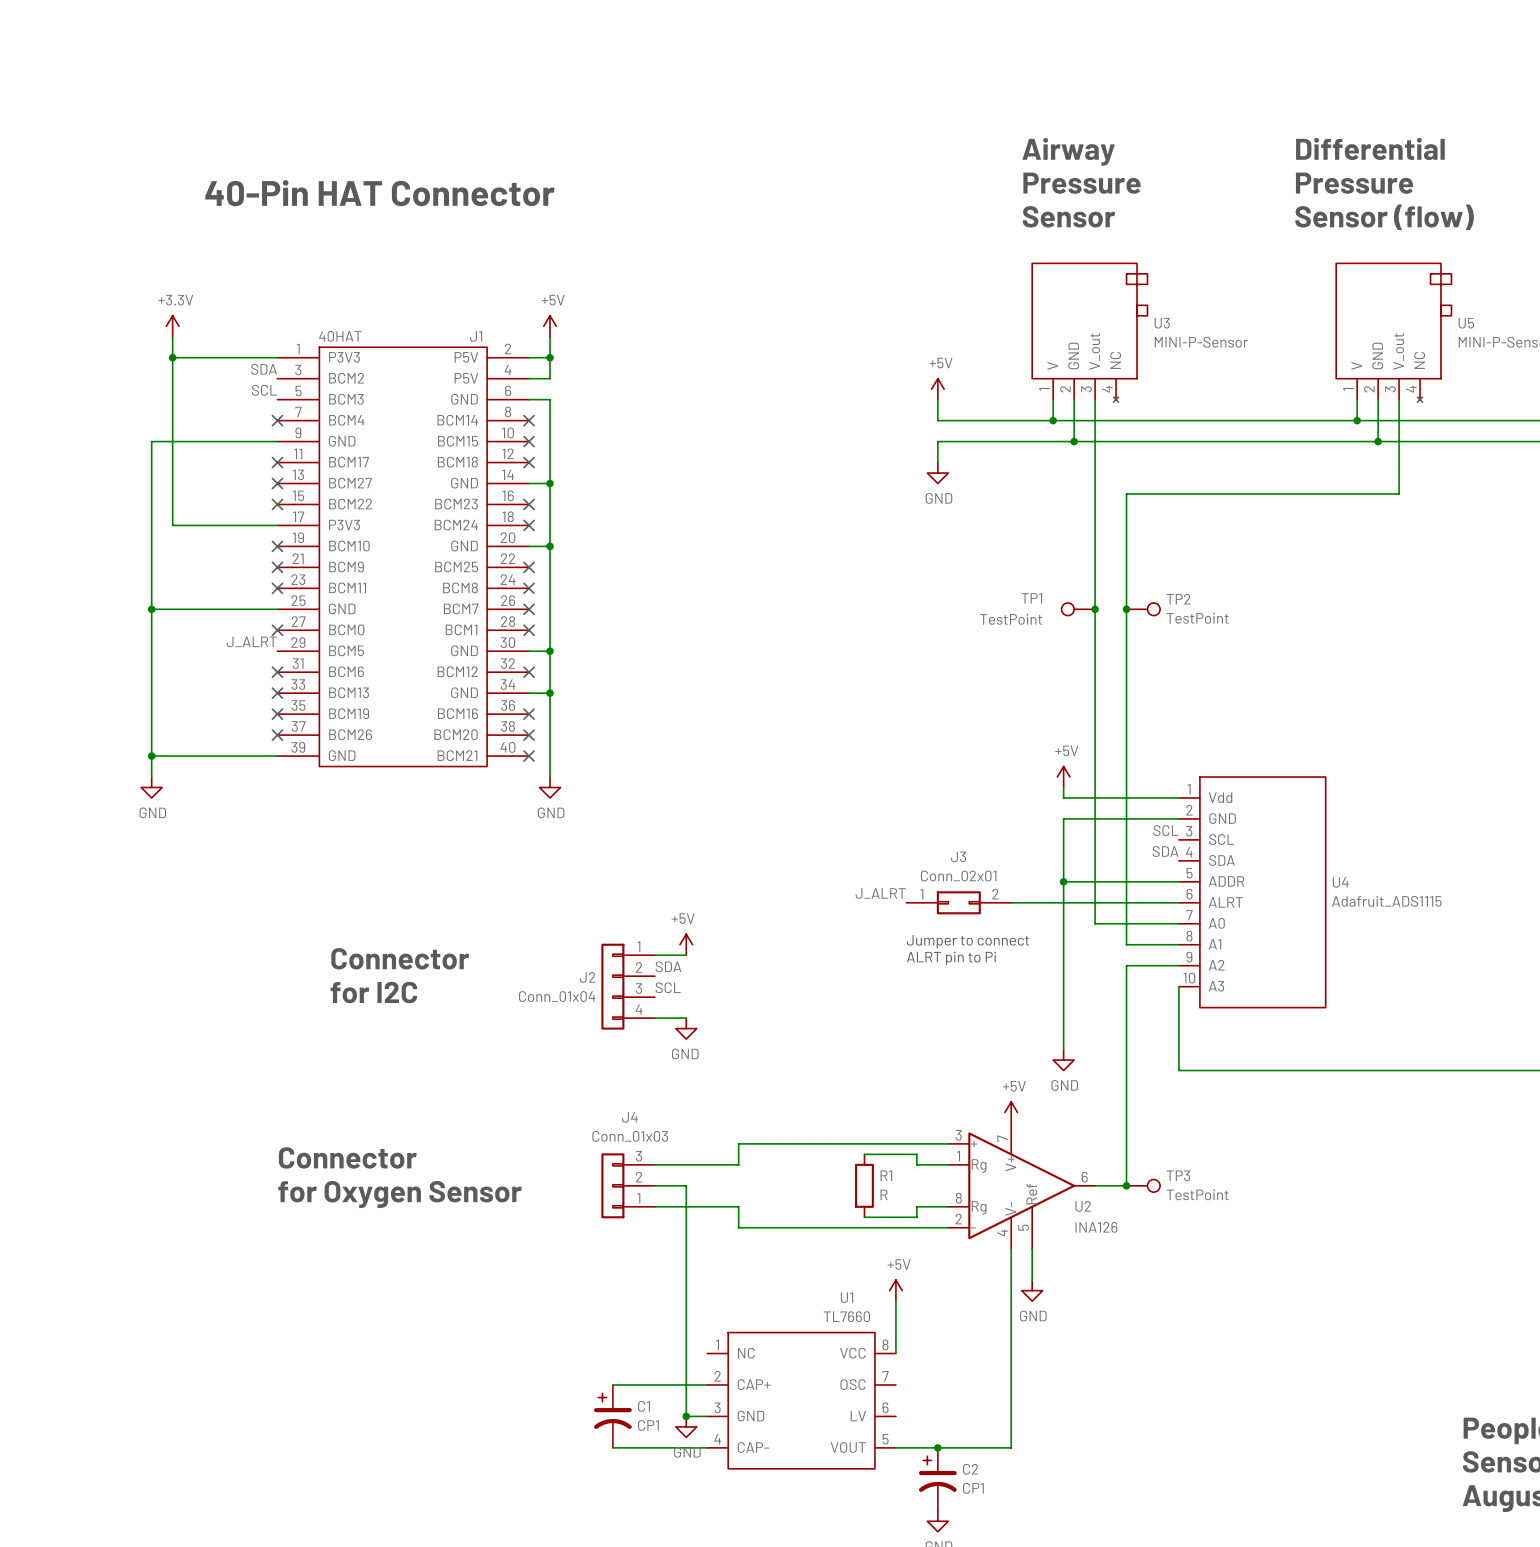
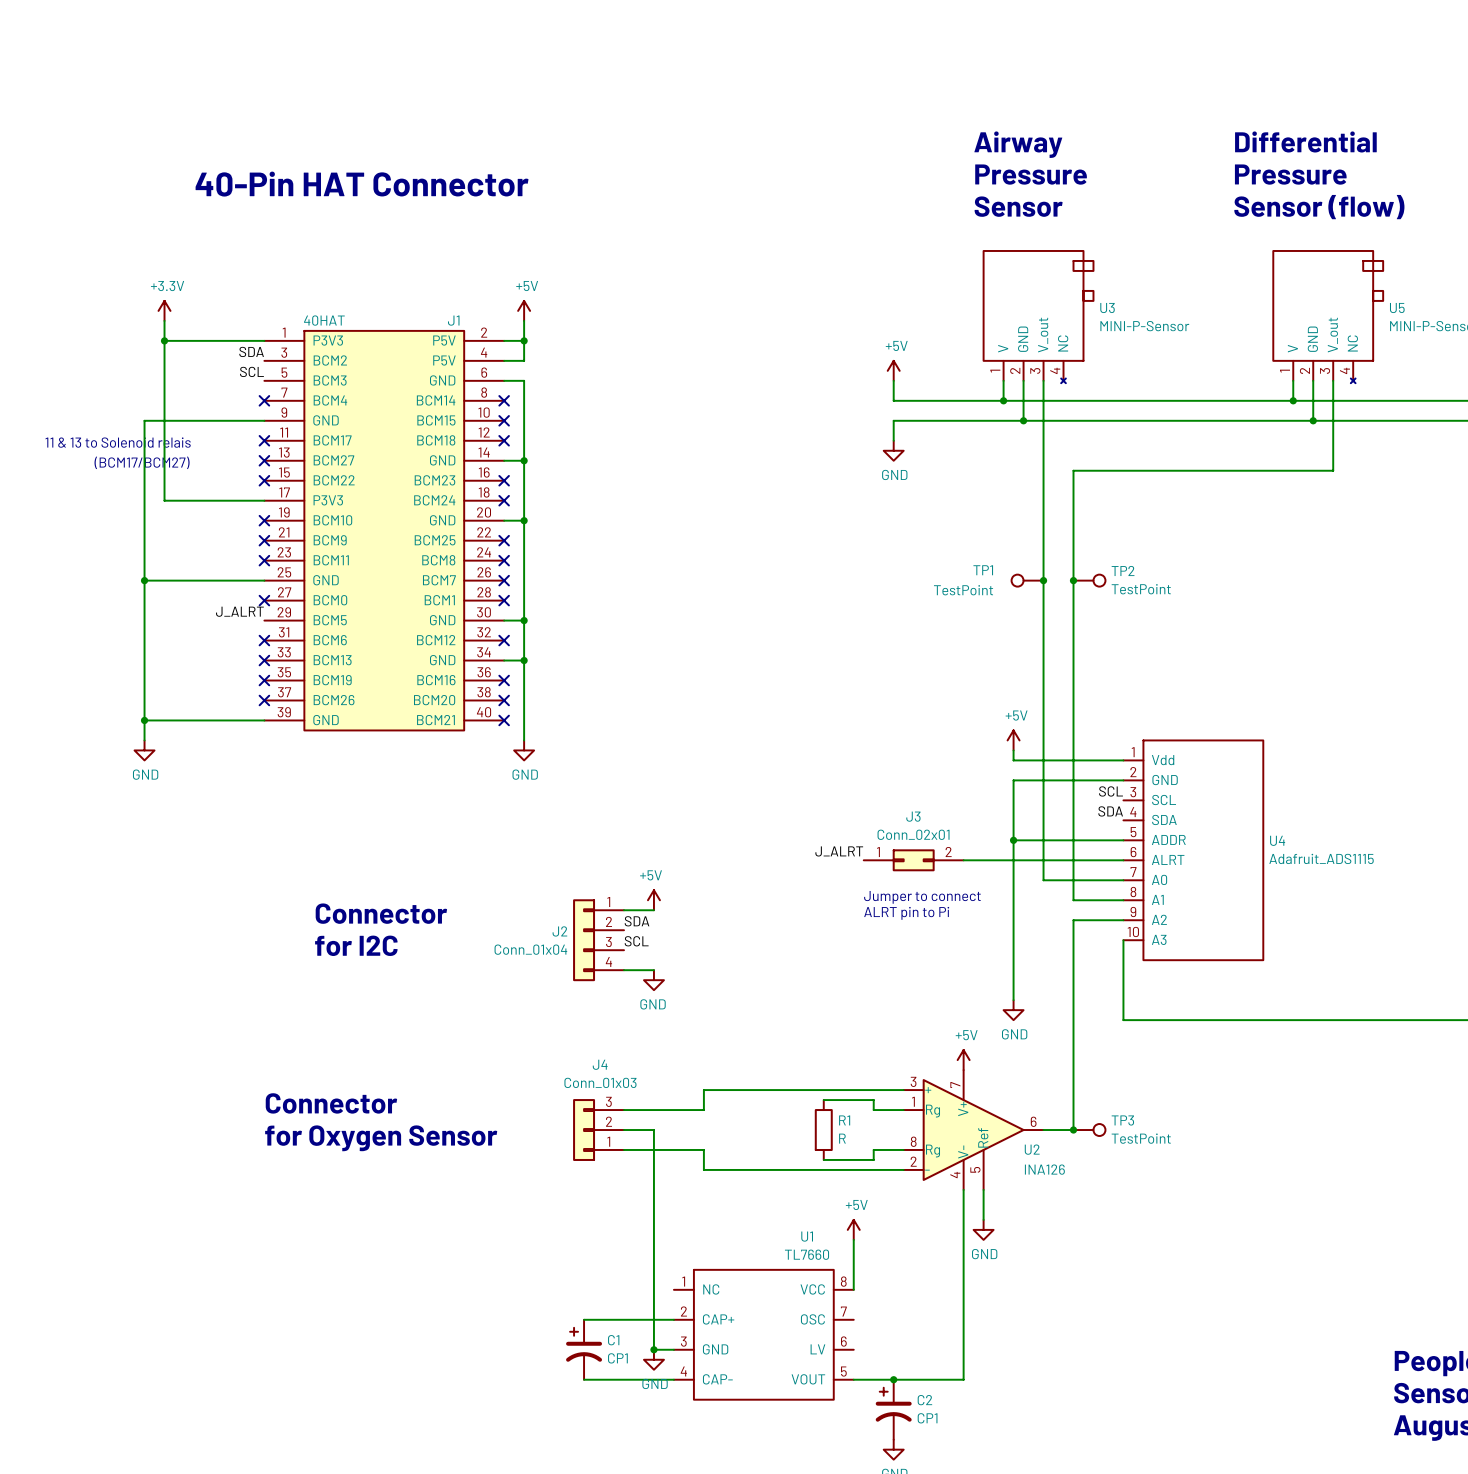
text: none -> 11 & 13 to Solenoid relais (118, 442)
text: none -> (BCM17/BCM27) (142, 462)

